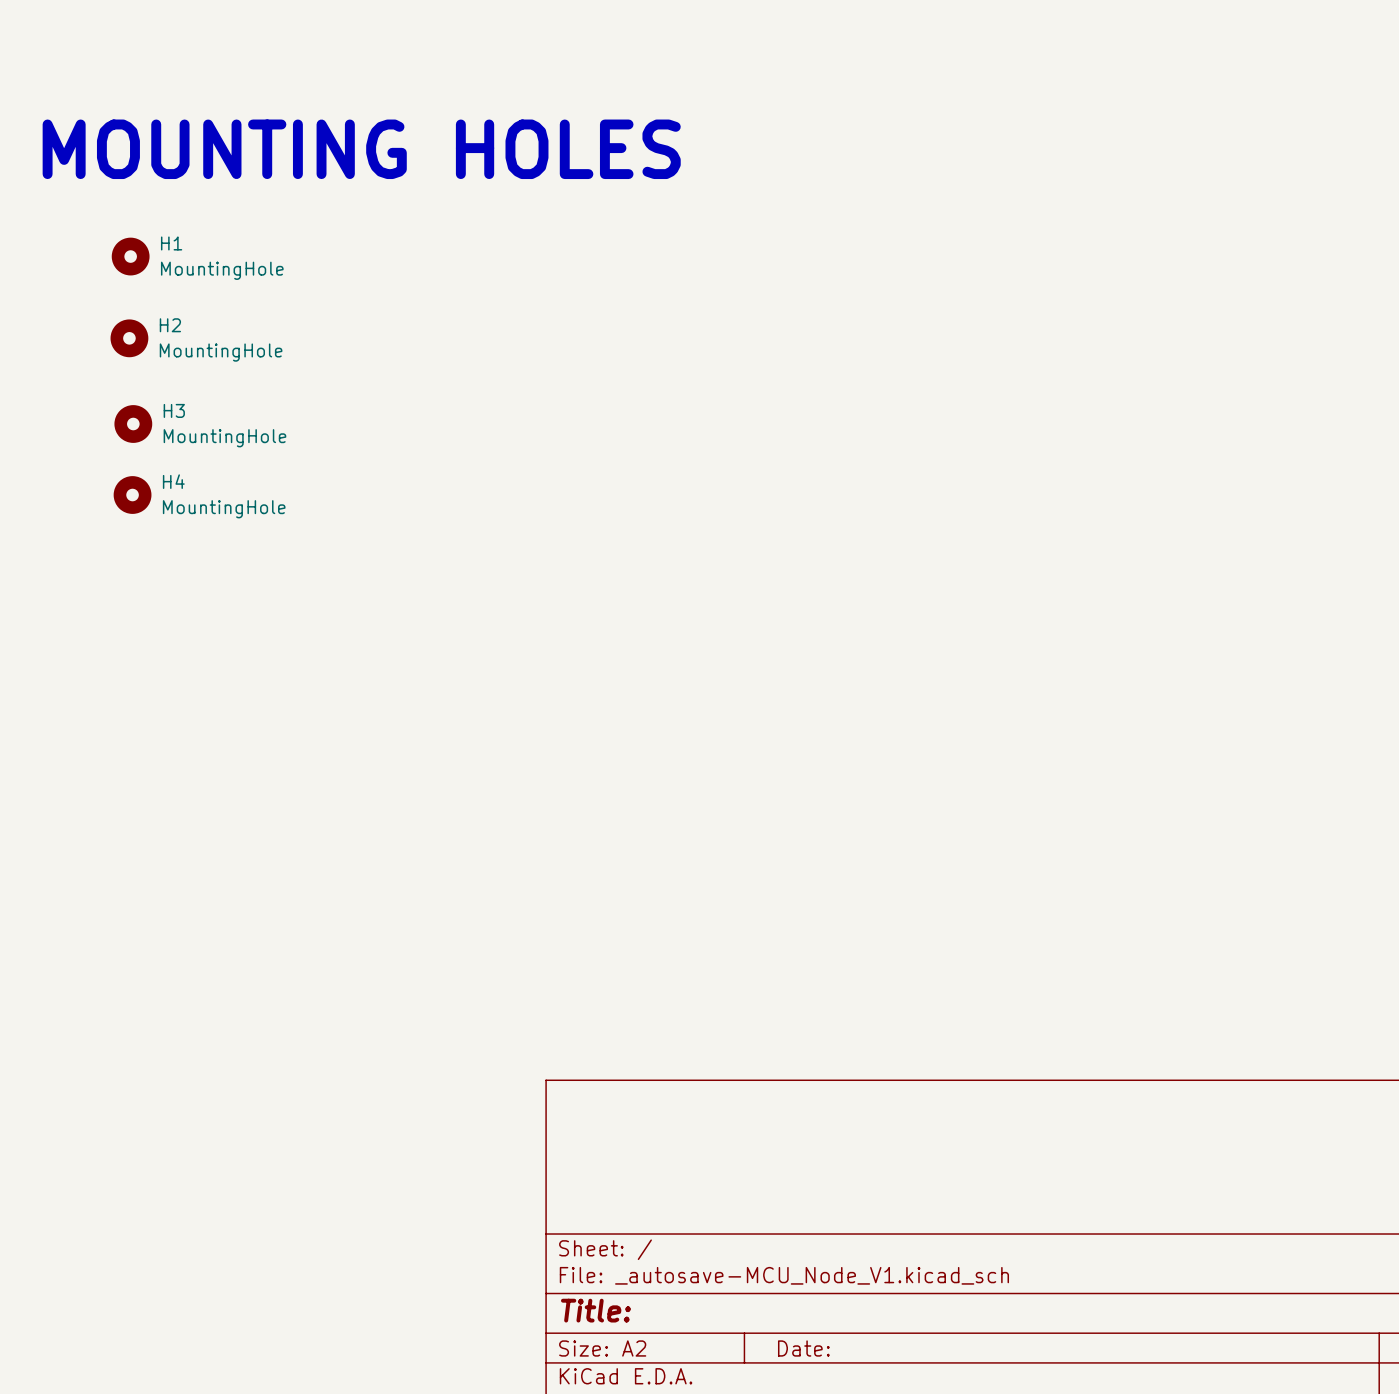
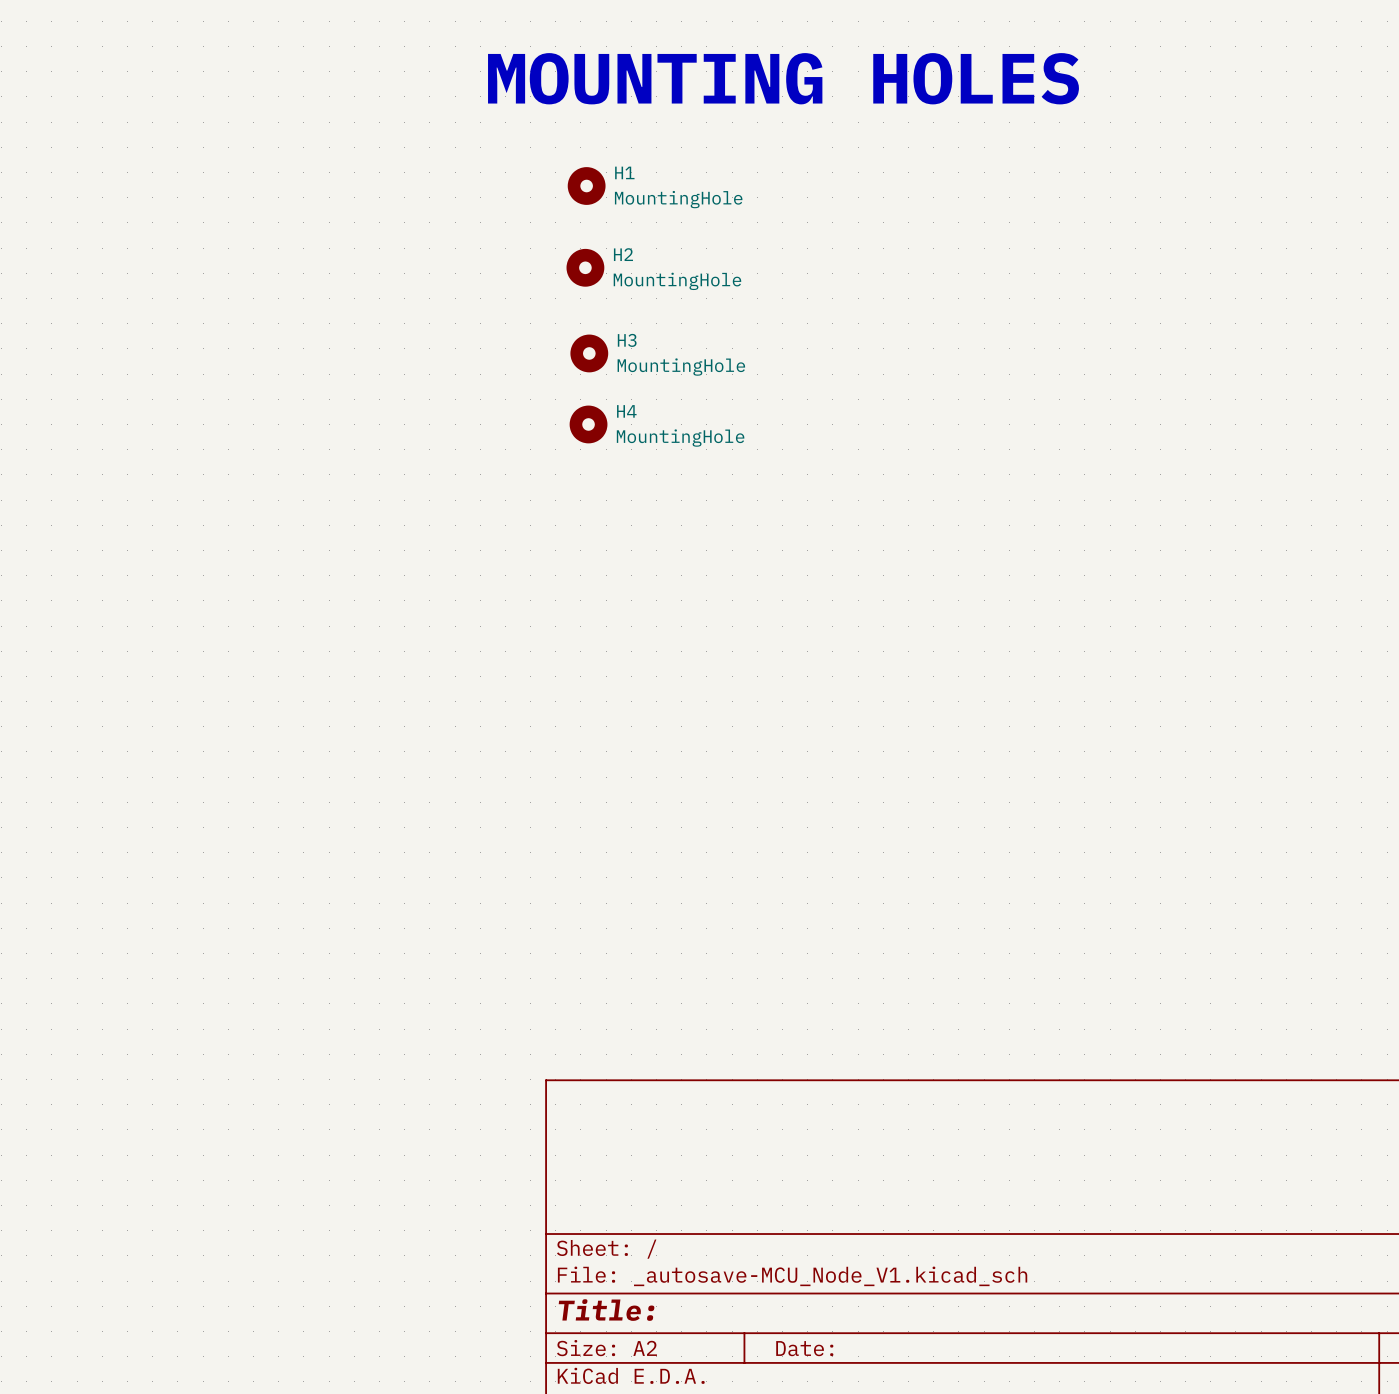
text: none -> MOUNTING HOLES (783, 78)
text: MOUNTING HOLES (361, 149) -> none
H1 position: (130, 256) -> (586, 186)
H2 position: (129, 338) -> (585, 267)
H3 position: (133, 424) -> (589, 353)
H4 position: (132, 495) -> (588, 424)

